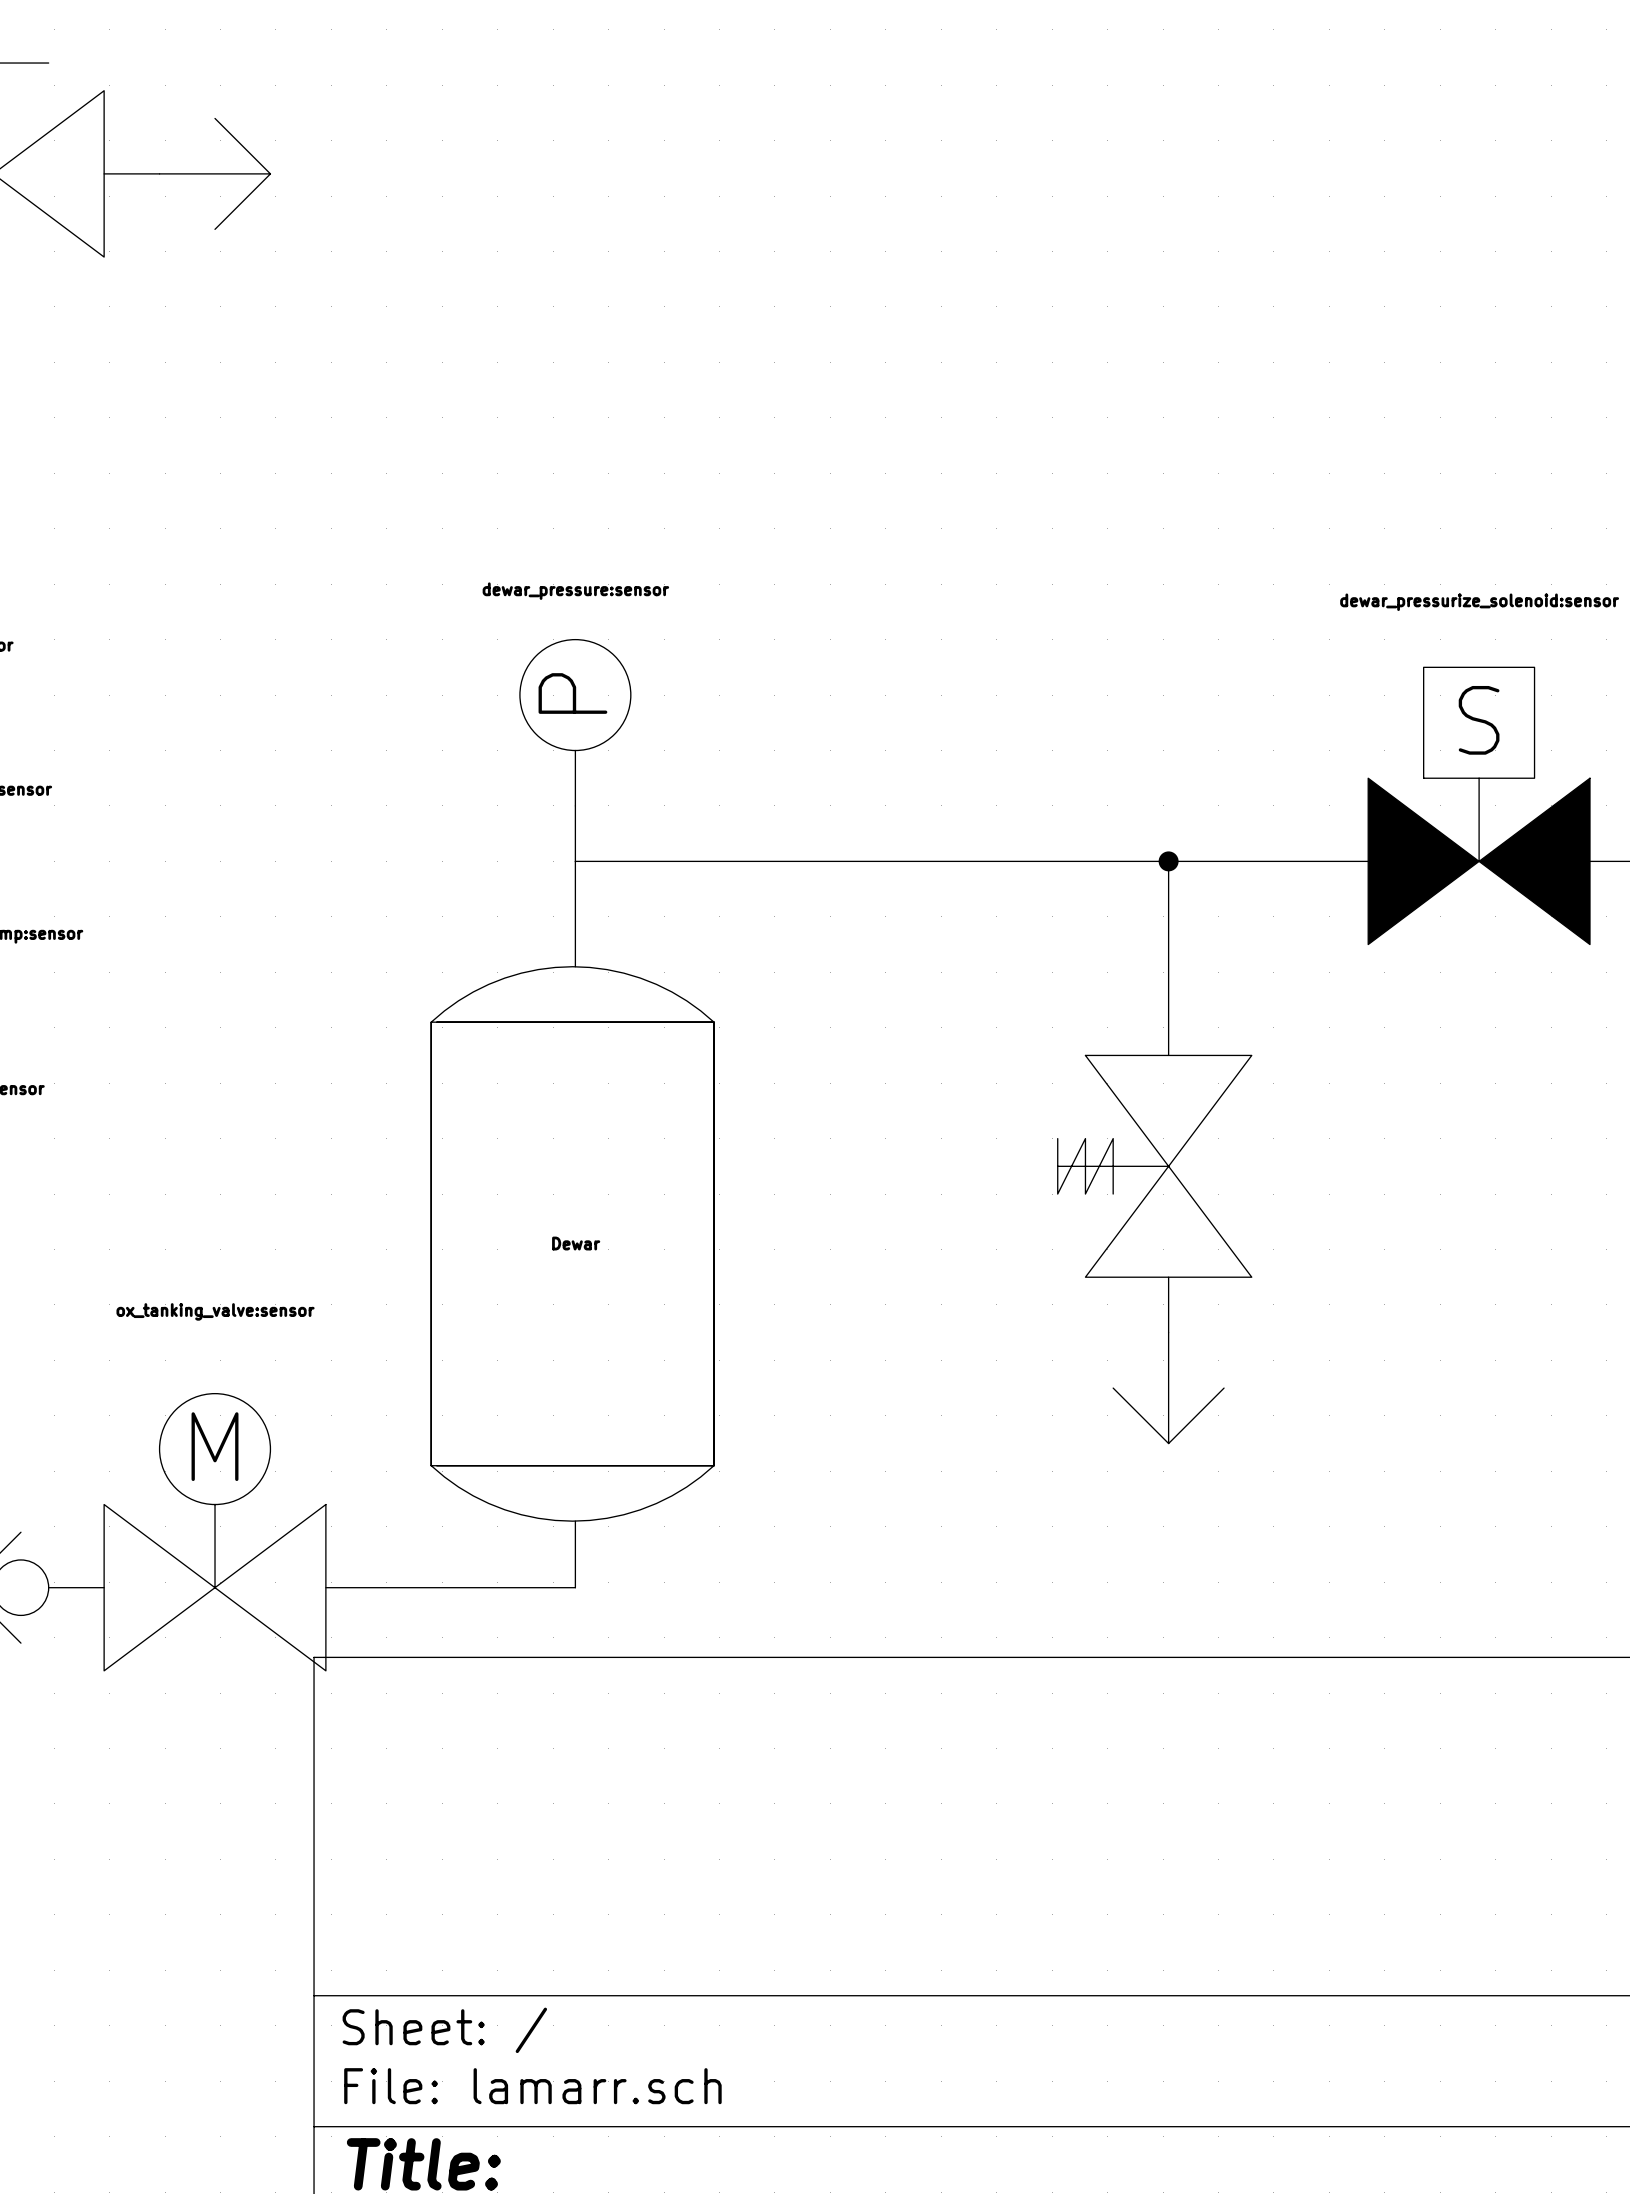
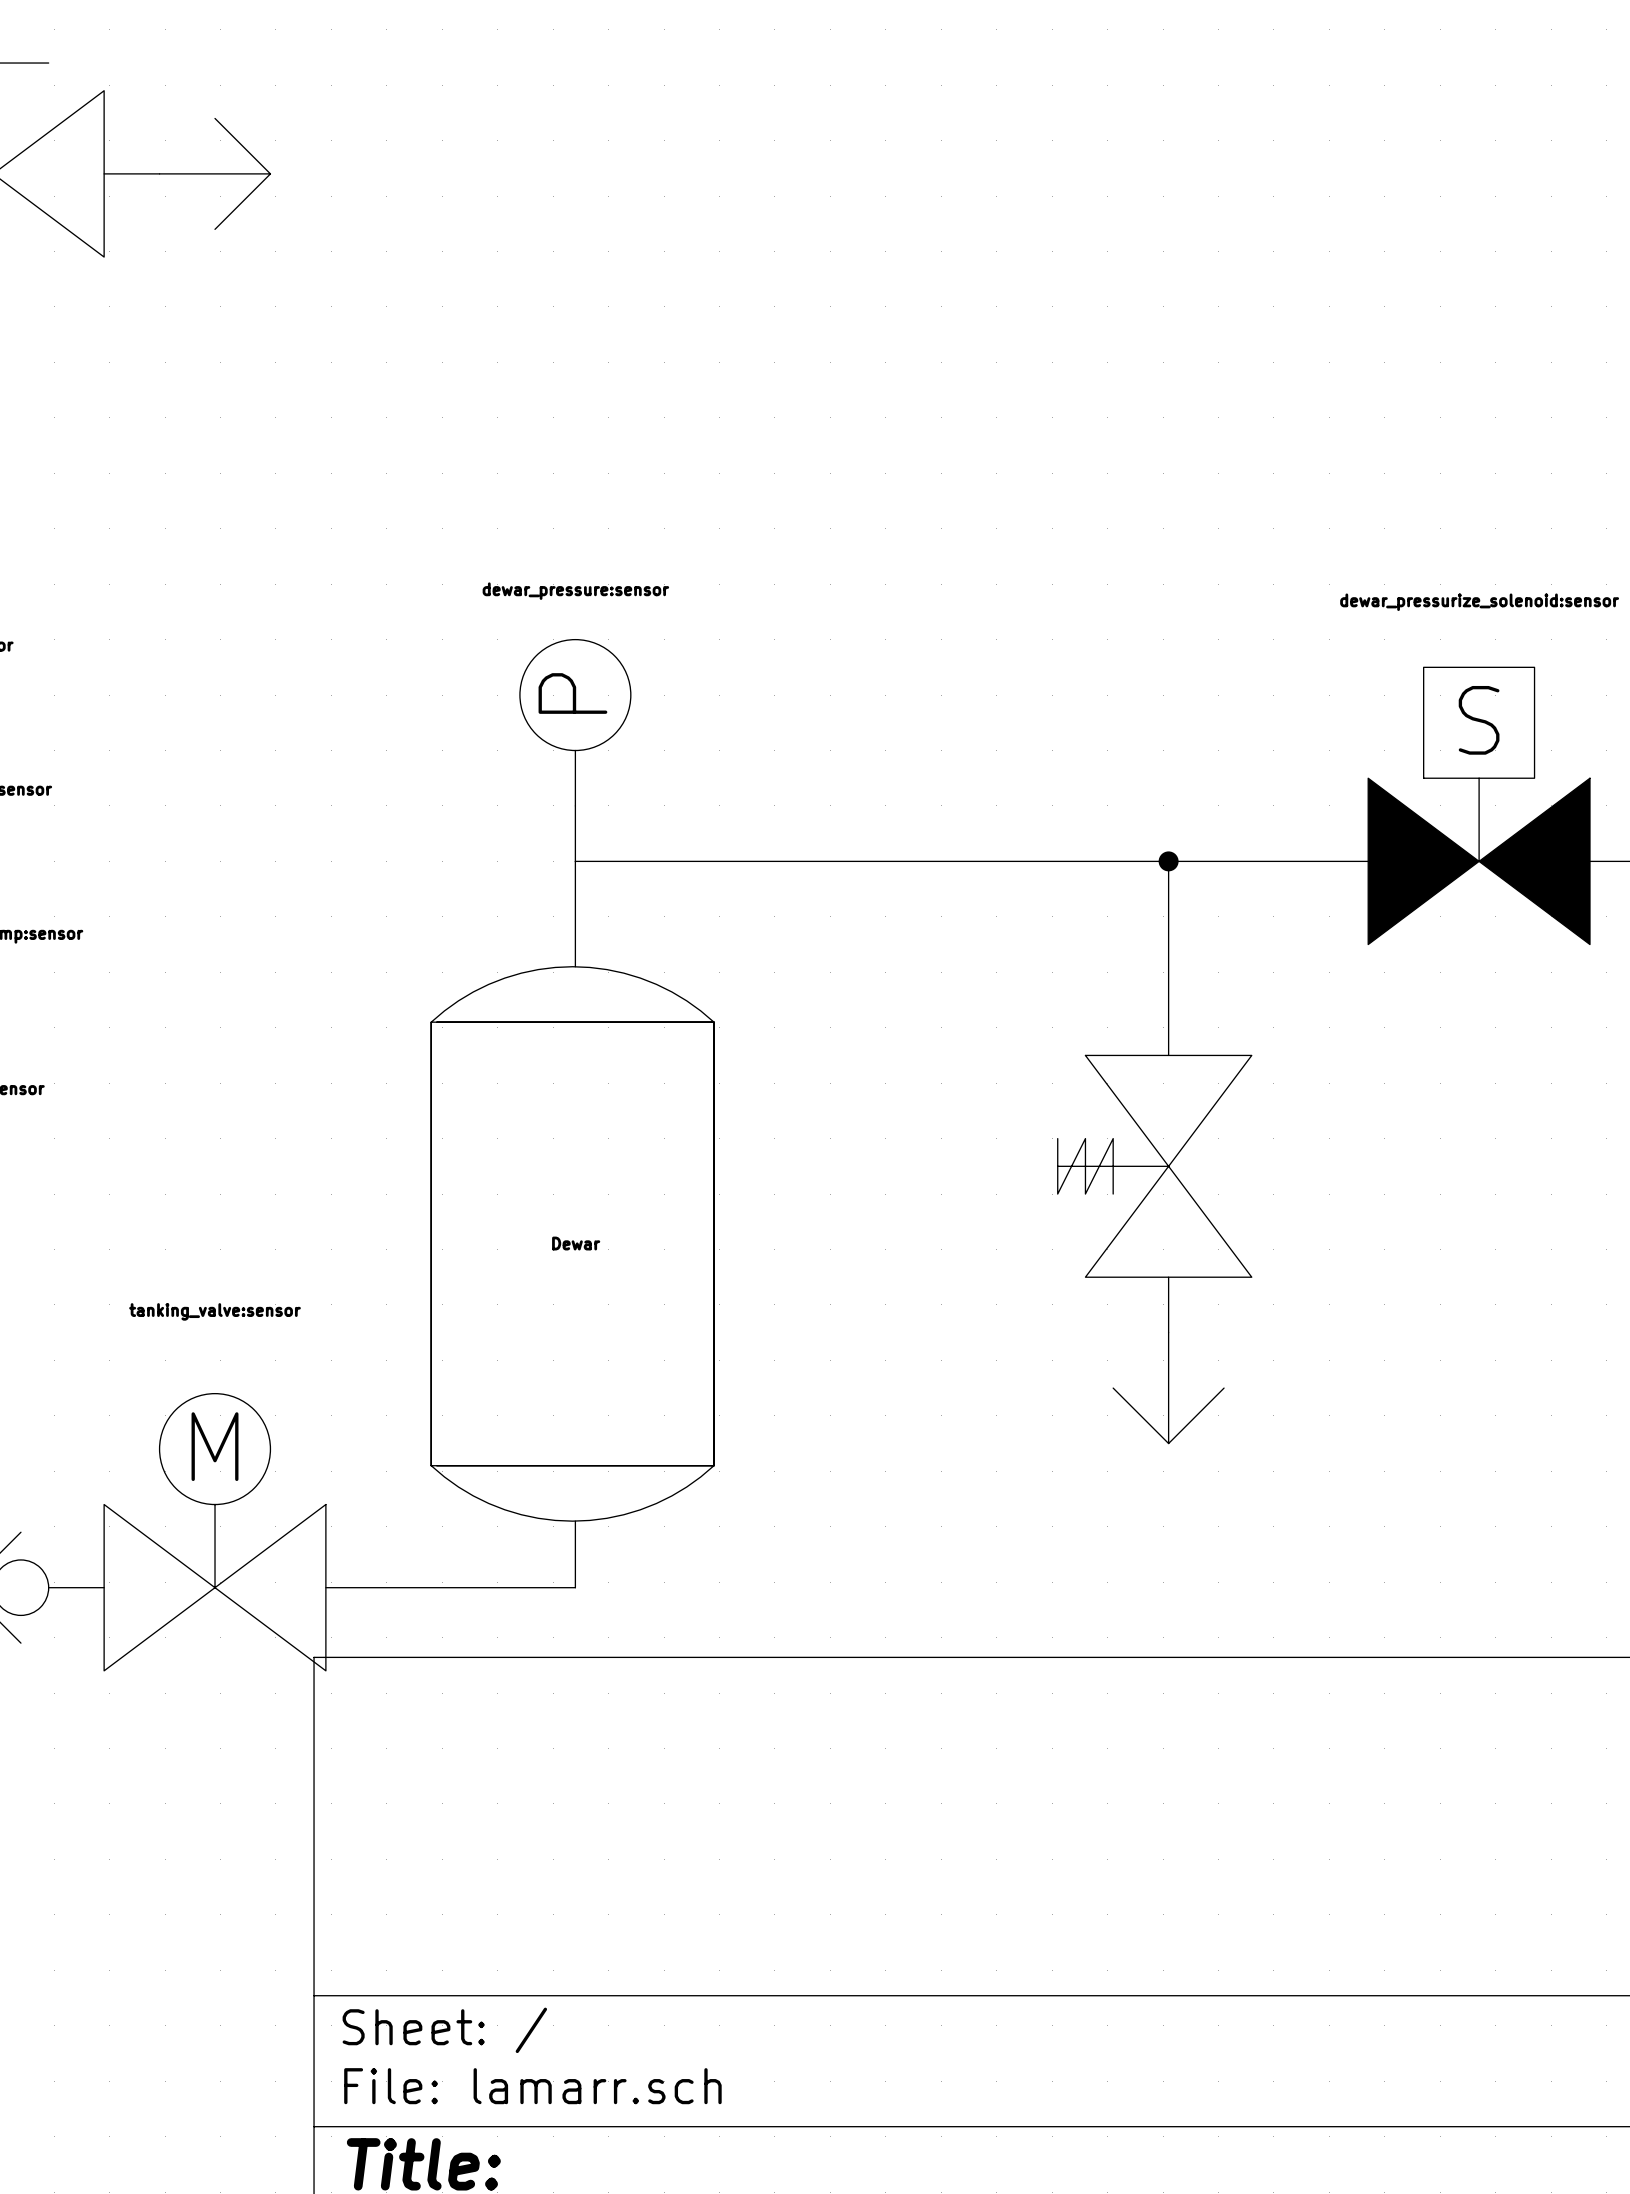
part value: ox_tanking_valve:sensor (215, 1311) -> tanking_valve:sensor (215, 1311)

